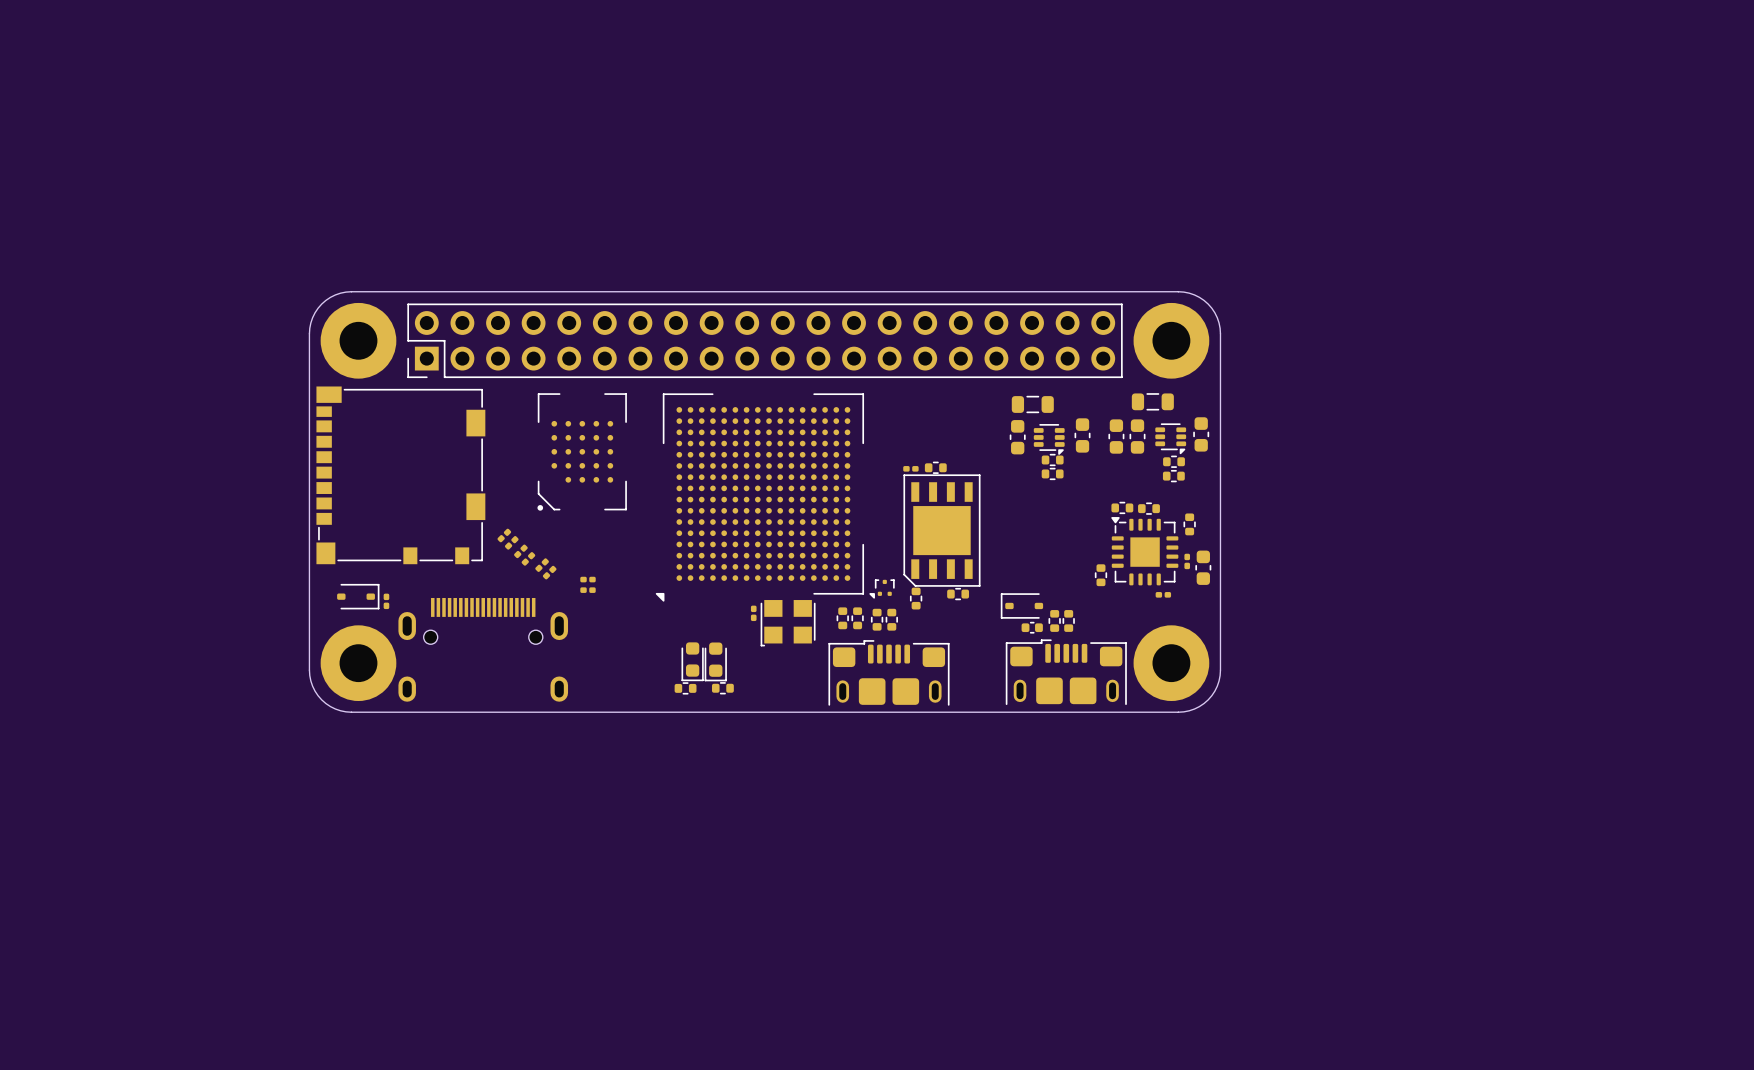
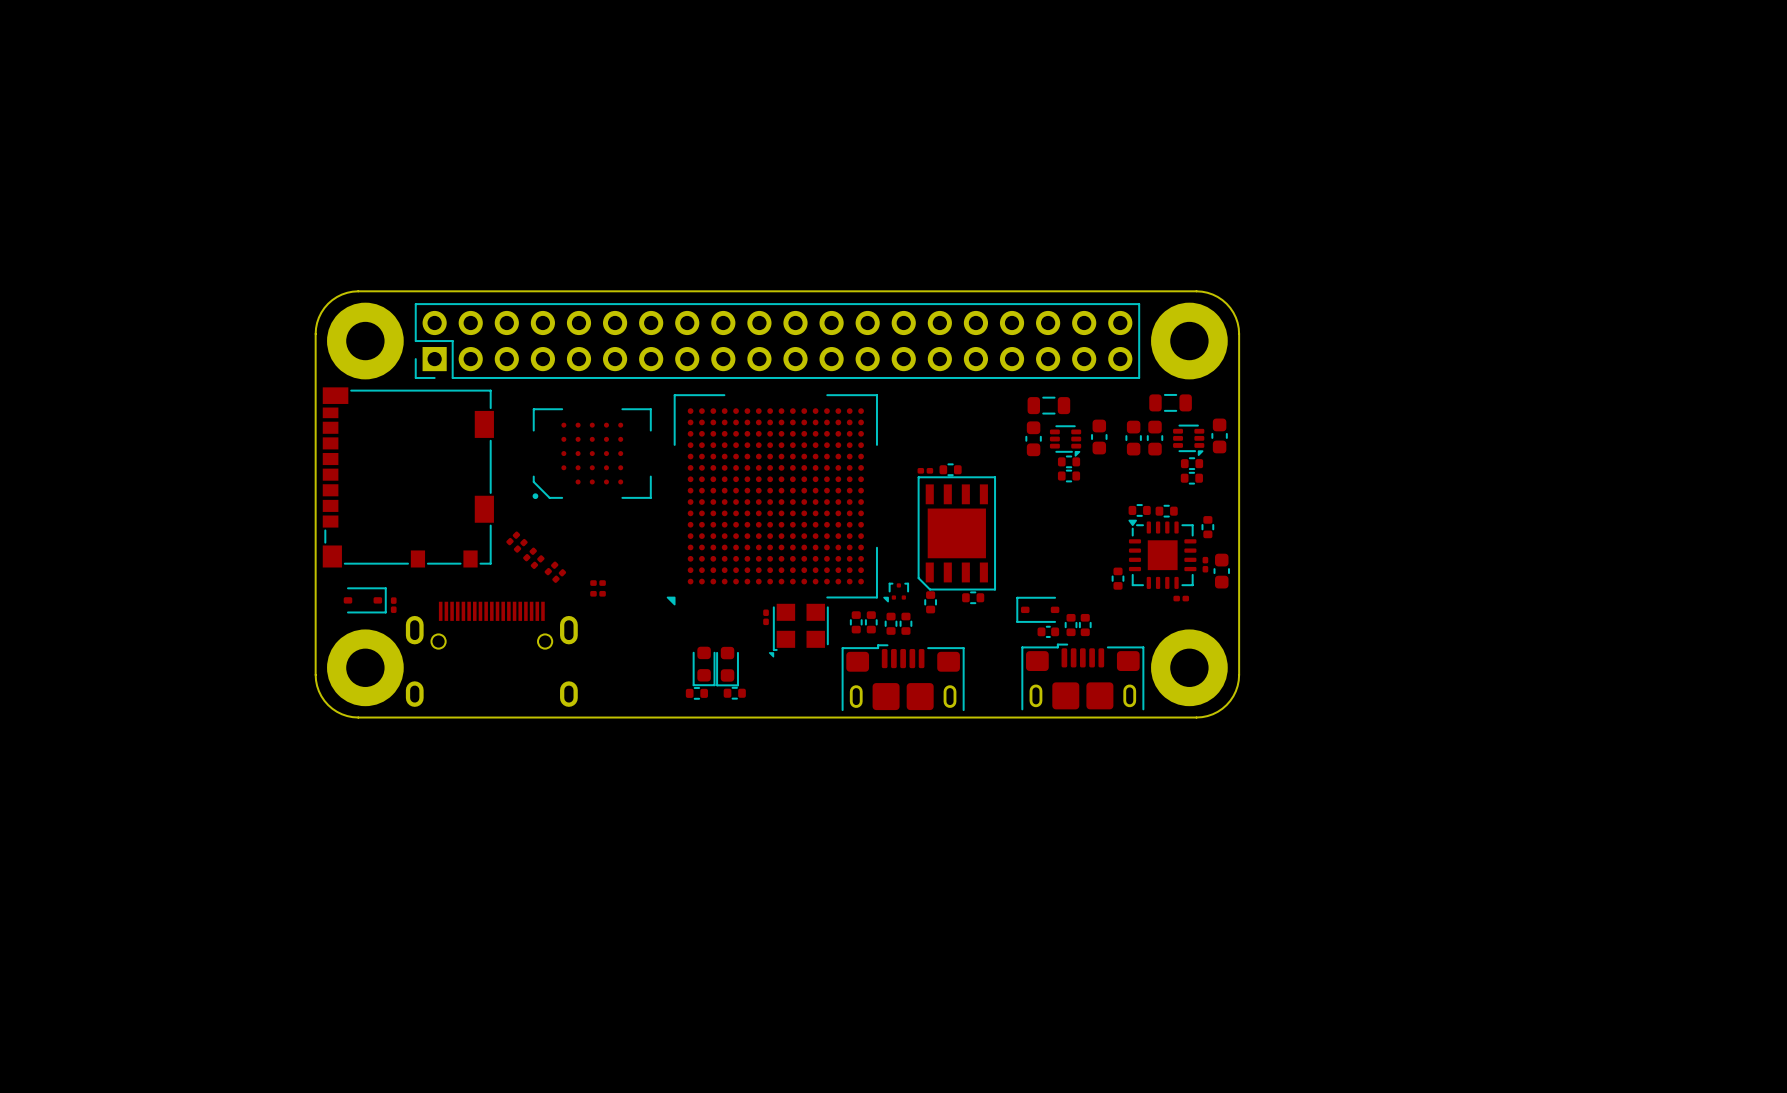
part footprint: [537, 393, 627, 511] -> [532, 408, 652, 500]
drawing: none -> [768, 652, 775, 658]

